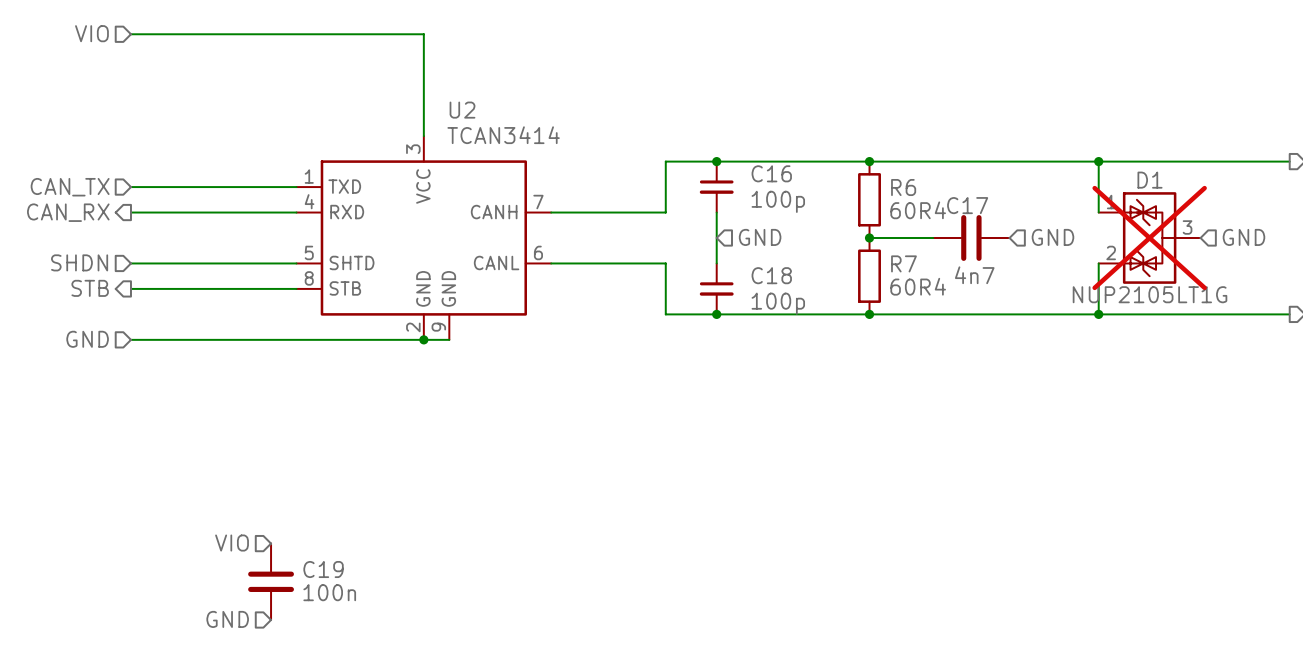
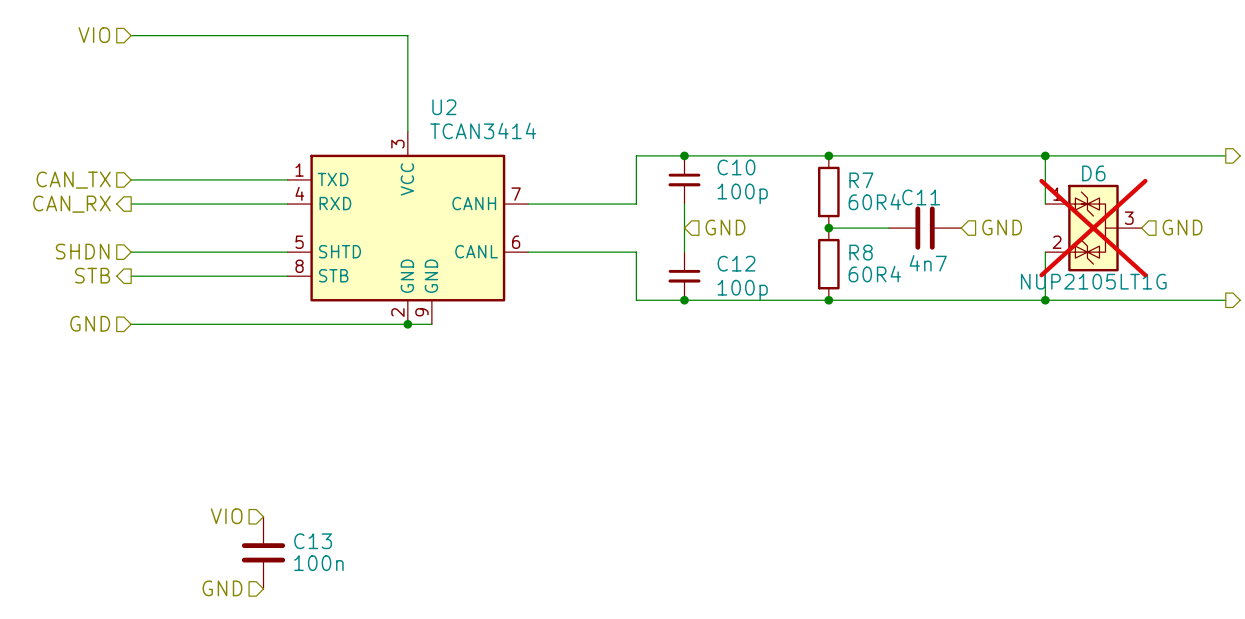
C16 name: C16 (771, 173) -> C10 (736, 167)
D1 name: D1 (1150, 180) -> D6 (1093, 173)
R6 name: R6 (903, 187) -> R7 (861, 180)
C17 name: C17 (967, 205) -> C11 (921, 197)
R7 name: R7 (903, 263) -> R8 (861, 252)
C18 name: C18 (771, 275) -> C12 (736, 263)
C19 name: C19 (323, 569) -> C13 (313, 541)

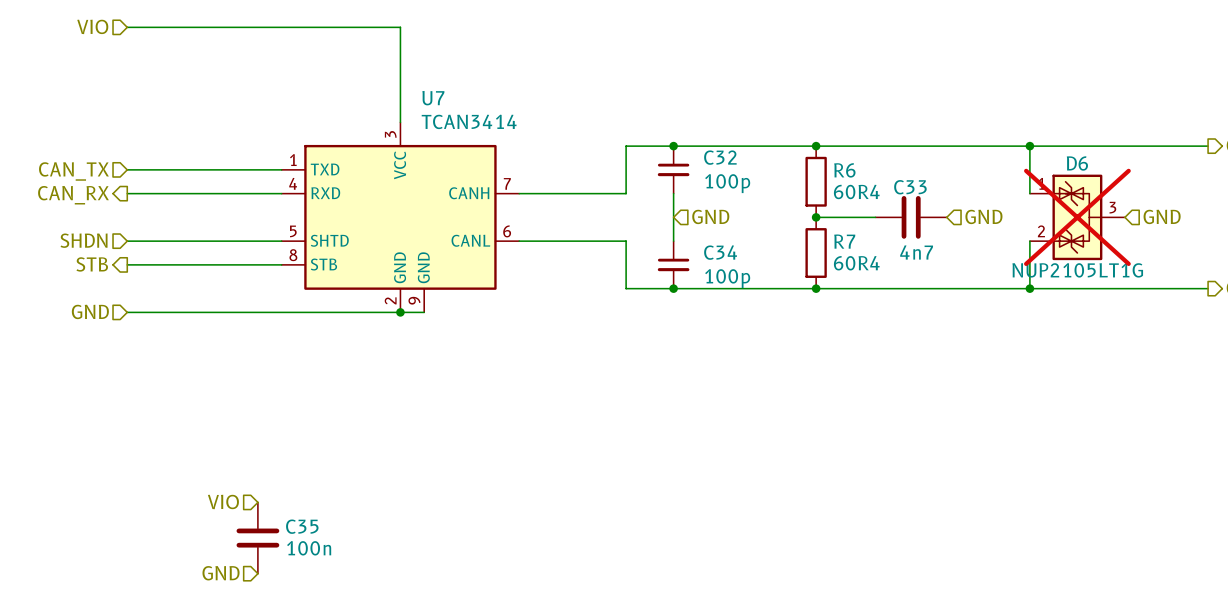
U2 name: U2 (444, 107) -> U7 (433, 98)
C10 name: C10 (736, 167) -> C32 (720, 157)
R7 name: R7 (861, 180) -> R6 (844, 170)
C11 name: C11 (921, 197) -> C33 (910, 187)
R8 name: R8 (861, 252) -> R7 (844, 241)
C12 name: C12 (736, 263) -> C34 (720, 252)
C13 name: C13 (313, 541) -> C35 (302, 526)

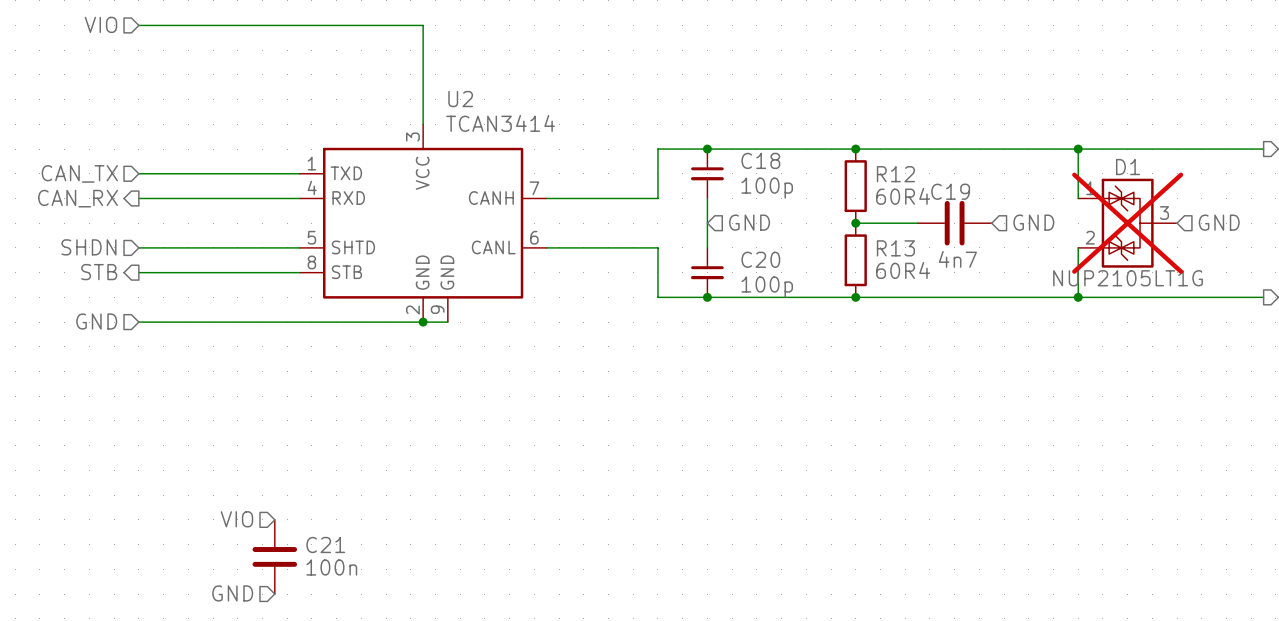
U7 name: U7 (433, 98) -> U2 (460, 99)
C32 name: C32 (720, 157) -> C18 (760, 160)
D6 name: D6 (1077, 163) -> D1 (1128, 167)
R6 name: R6 (844, 170) -> R12 (895, 174)
C33 name: C33 (910, 187) -> C19 (950, 191)
R7 name: R7 (844, 241) -> R13 (895, 248)
C34 name: C34 (720, 252) -> C20 (760, 259)
C35 name: C35 (302, 526) -> C21 (325, 545)

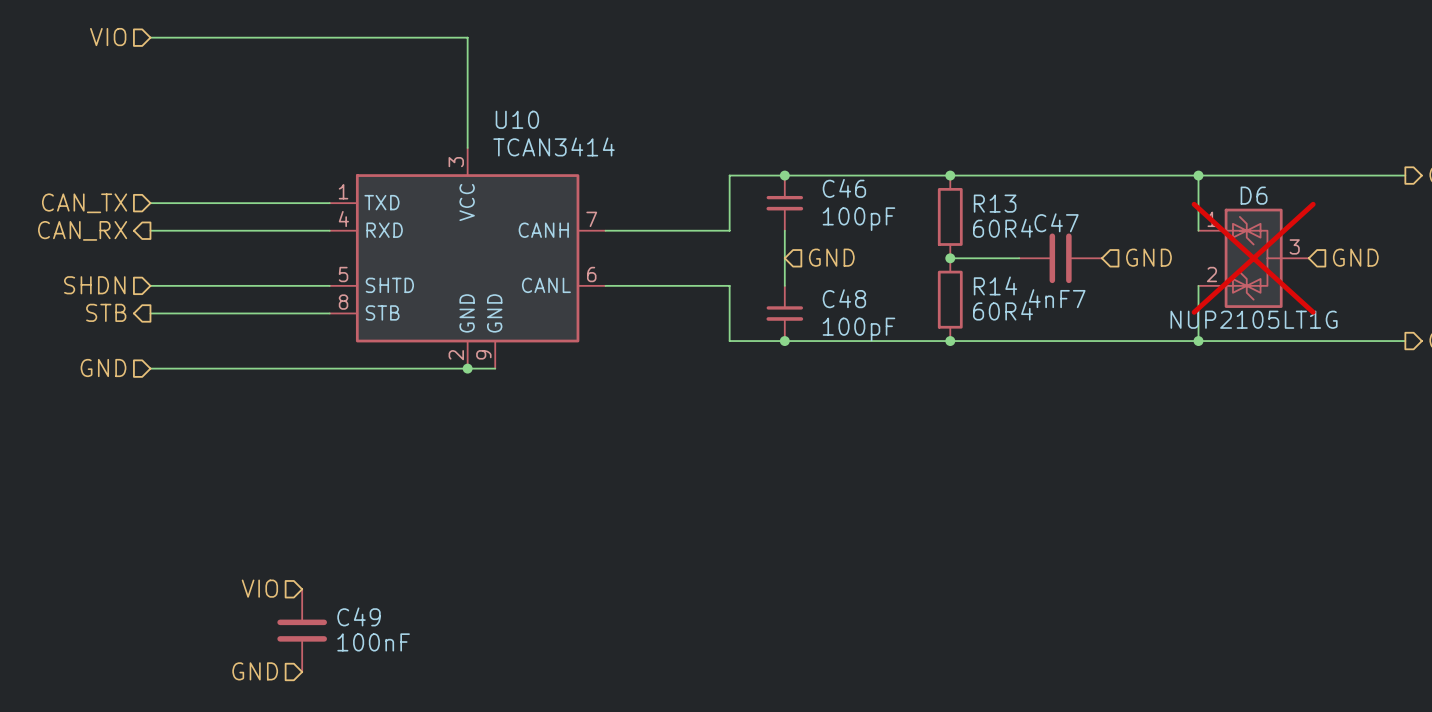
U2 name: U2 (460, 99) -> U10 (517, 119)
C18 name: C18 (760, 160) -> C46 (844, 188)
D1 name: D1 (1128, 167) -> D6 (1254, 195)
R12 name: R12 (895, 174) -> R13 (995, 203)
C18 value: 100p (767, 188) -> 100pF (858, 219)
C19 name: C19 (950, 191) -> C47 (1056, 222)
R13 name: R13 (895, 248) -> R14 (995, 285)
C20 name: C20 (760, 259) -> C48 (844, 298)
C19 value: 4n7 (957, 259) -> 4nF7 (1057, 298)
C20 value: 100p (767, 286) -> 100pF (858, 329)
C21 name: C21 (325, 545) -> C49 (359, 616)
C21 value: 100n (331, 567) -> 100nF (373, 642)

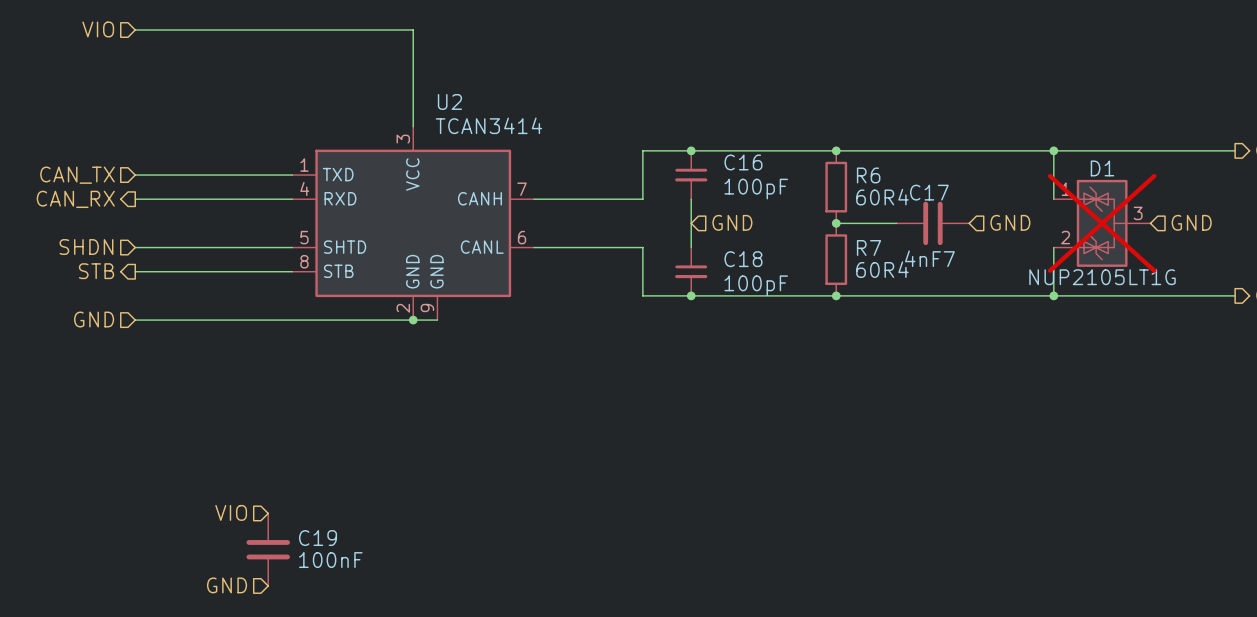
U10 name: U10 (517, 119) -> U2 (449, 101)
C46 name: C46 (844, 188) -> C16 (743, 162)
D6 name: D6 (1254, 195) -> D1 (1102, 168)
R13 name: R13 (995, 203) -> R6 (868, 175)
C47 name: C47 (1056, 222) -> C17 (929, 192)
R14 name: R14 (995, 285) -> R7 (868, 247)
C48 name: C48 (844, 298) -> C18 (743, 259)
C49 name: C49 (359, 616) -> C19 (318, 538)

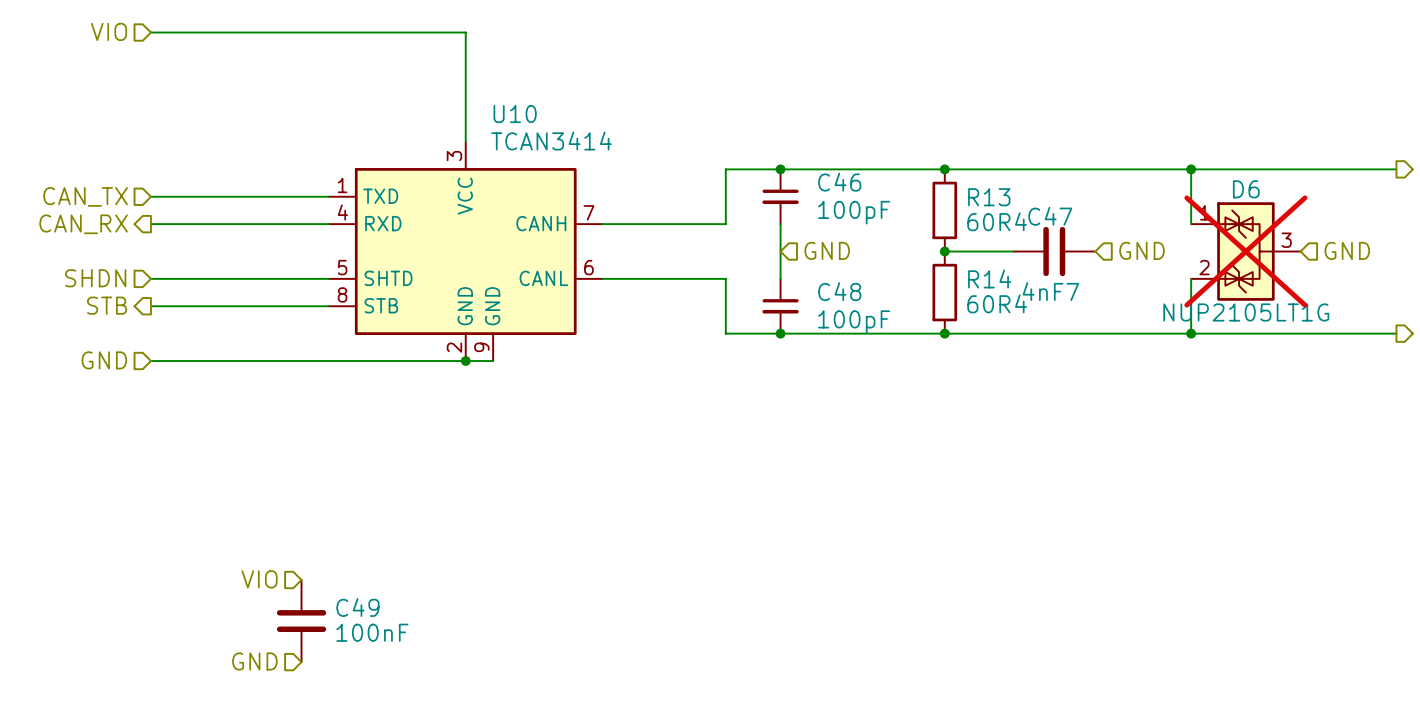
U2 name: U2 (449, 101) -> U10 (515, 114)
C16 name: C16 (743, 162) -> C46 (839, 182)
D1 name: D1 (1102, 168) -> D6 (1246, 189)
R6 name: R6 (868, 175) -> R13 (989, 197)
C17 name: C17 (929, 192) -> C47 (1050, 216)
R7 name: R7 (868, 247) -> R14 (989, 278)
C18 name: C18 (743, 259) -> C48 (839, 291)
C19 name: C19 (318, 538) -> C49 (357, 607)

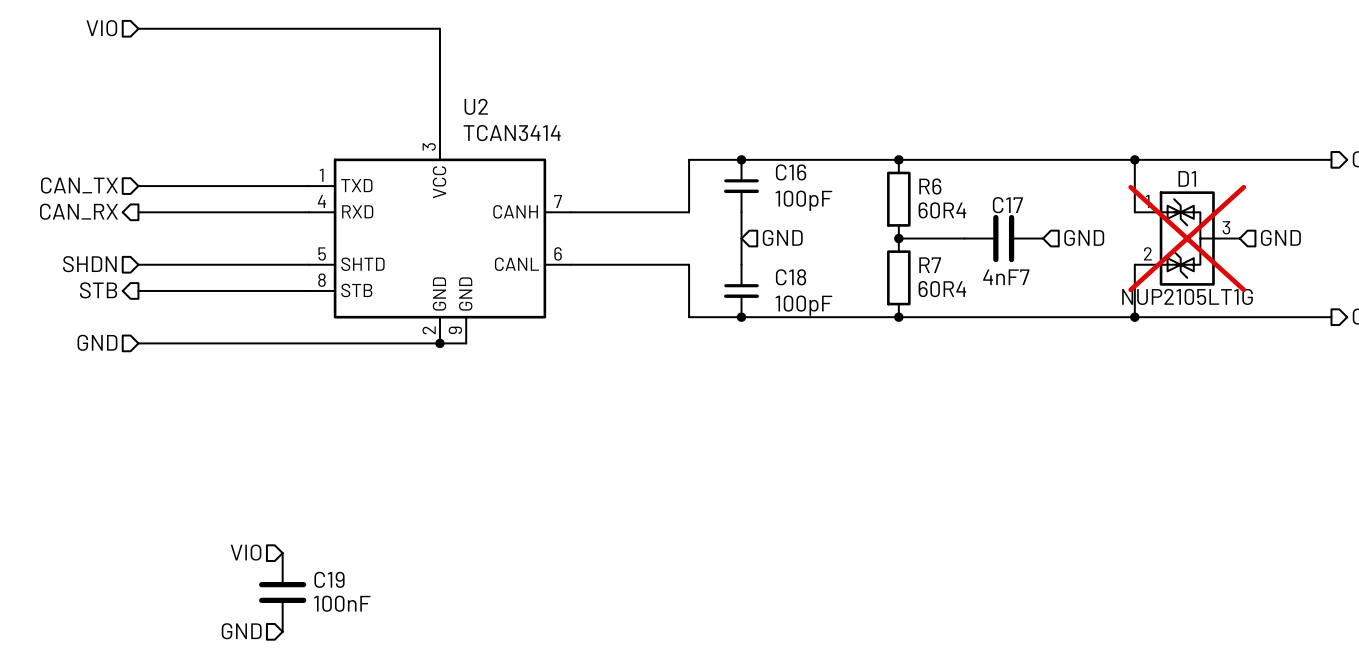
U10 name: U10 (515, 114) -> U2 (476, 106)
C46 name: C46 (839, 182) -> C16 (791, 172)
D6 name: D6 (1246, 189) -> D1 (1187, 178)
R13 name: R13 (989, 197) -> R6 (930, 186)
C47 name: C47 (1050, 216) -> C17 (1007, 205)
R14 name: R14 (989, 278) -> R7 (930, 265)
C48 name: C48 (839, 291) -> C18 (791, 277)
C49 name: C49 (357, 607) -> C19 (329, 579)

